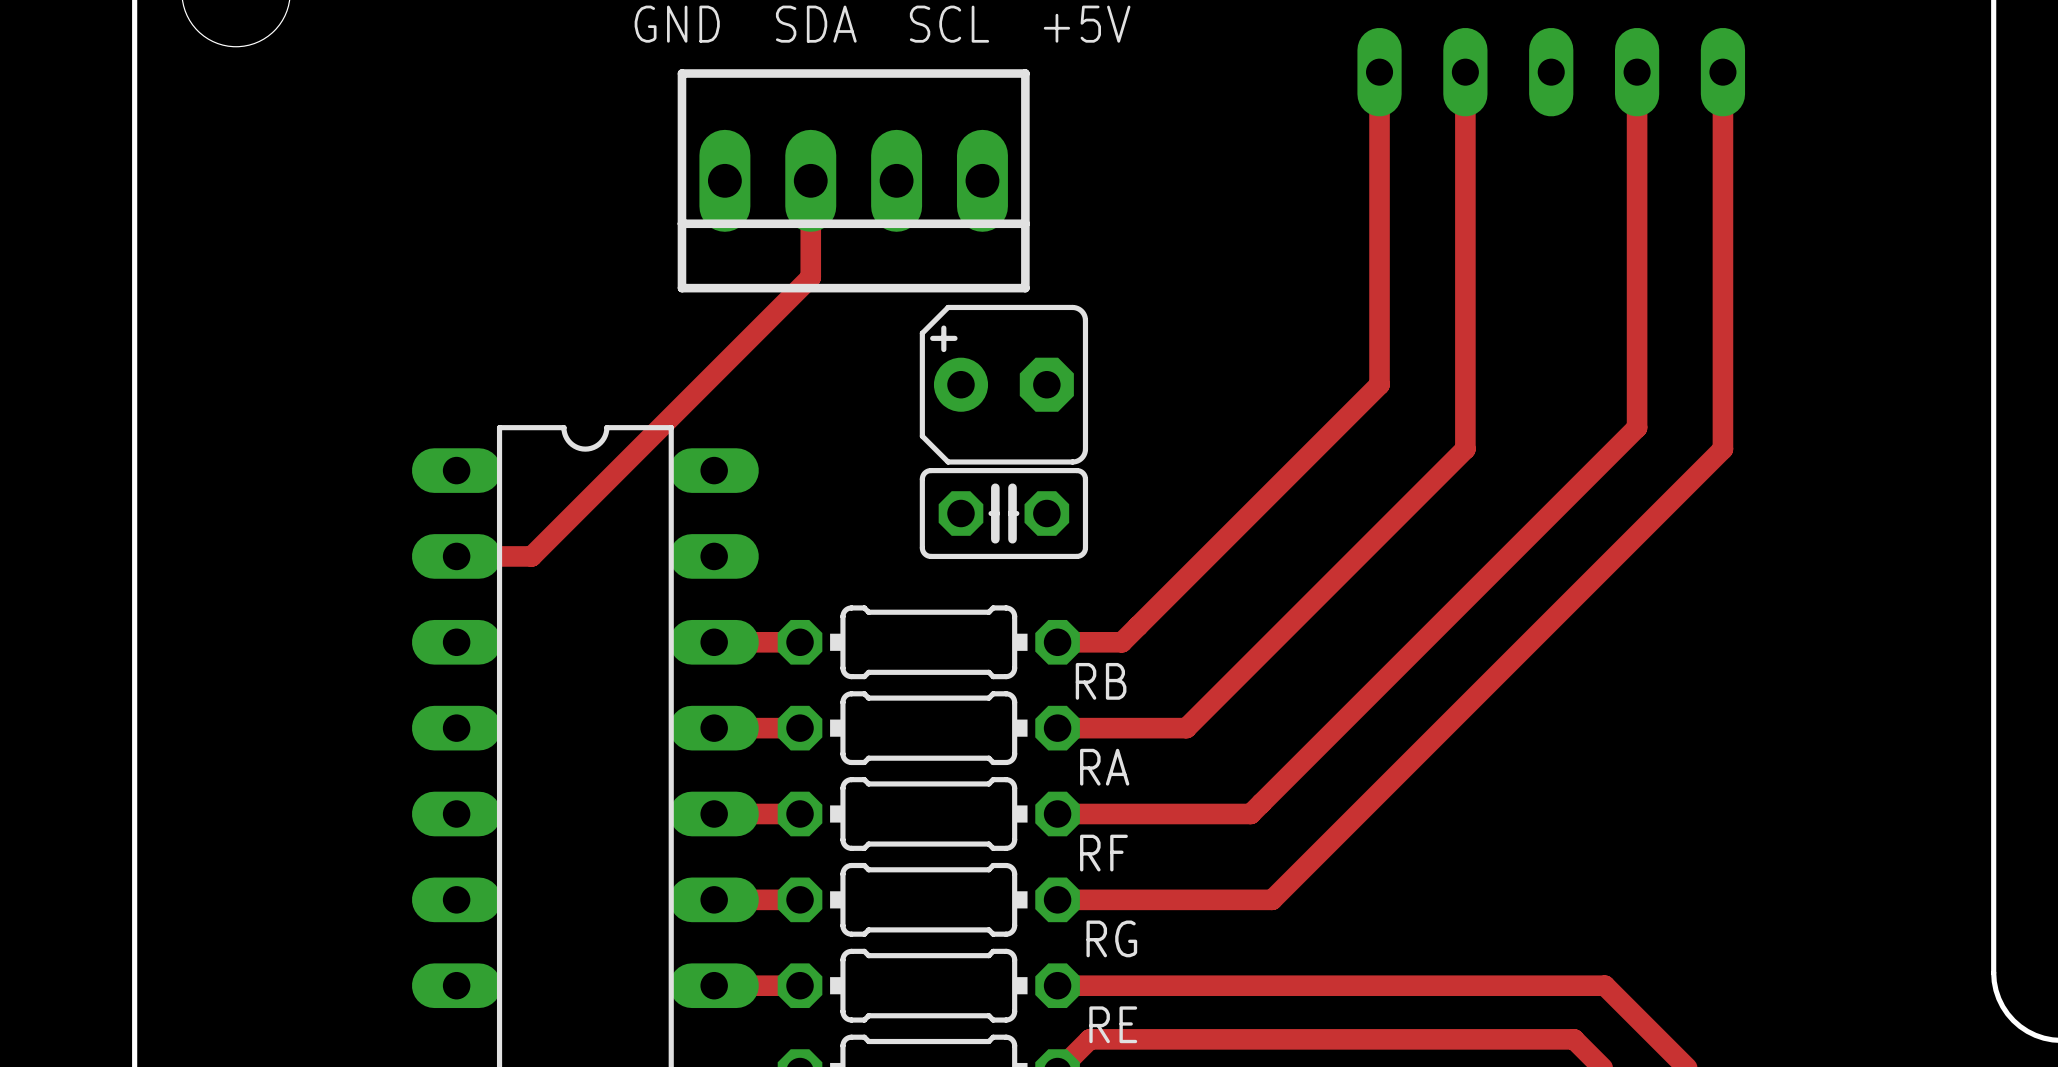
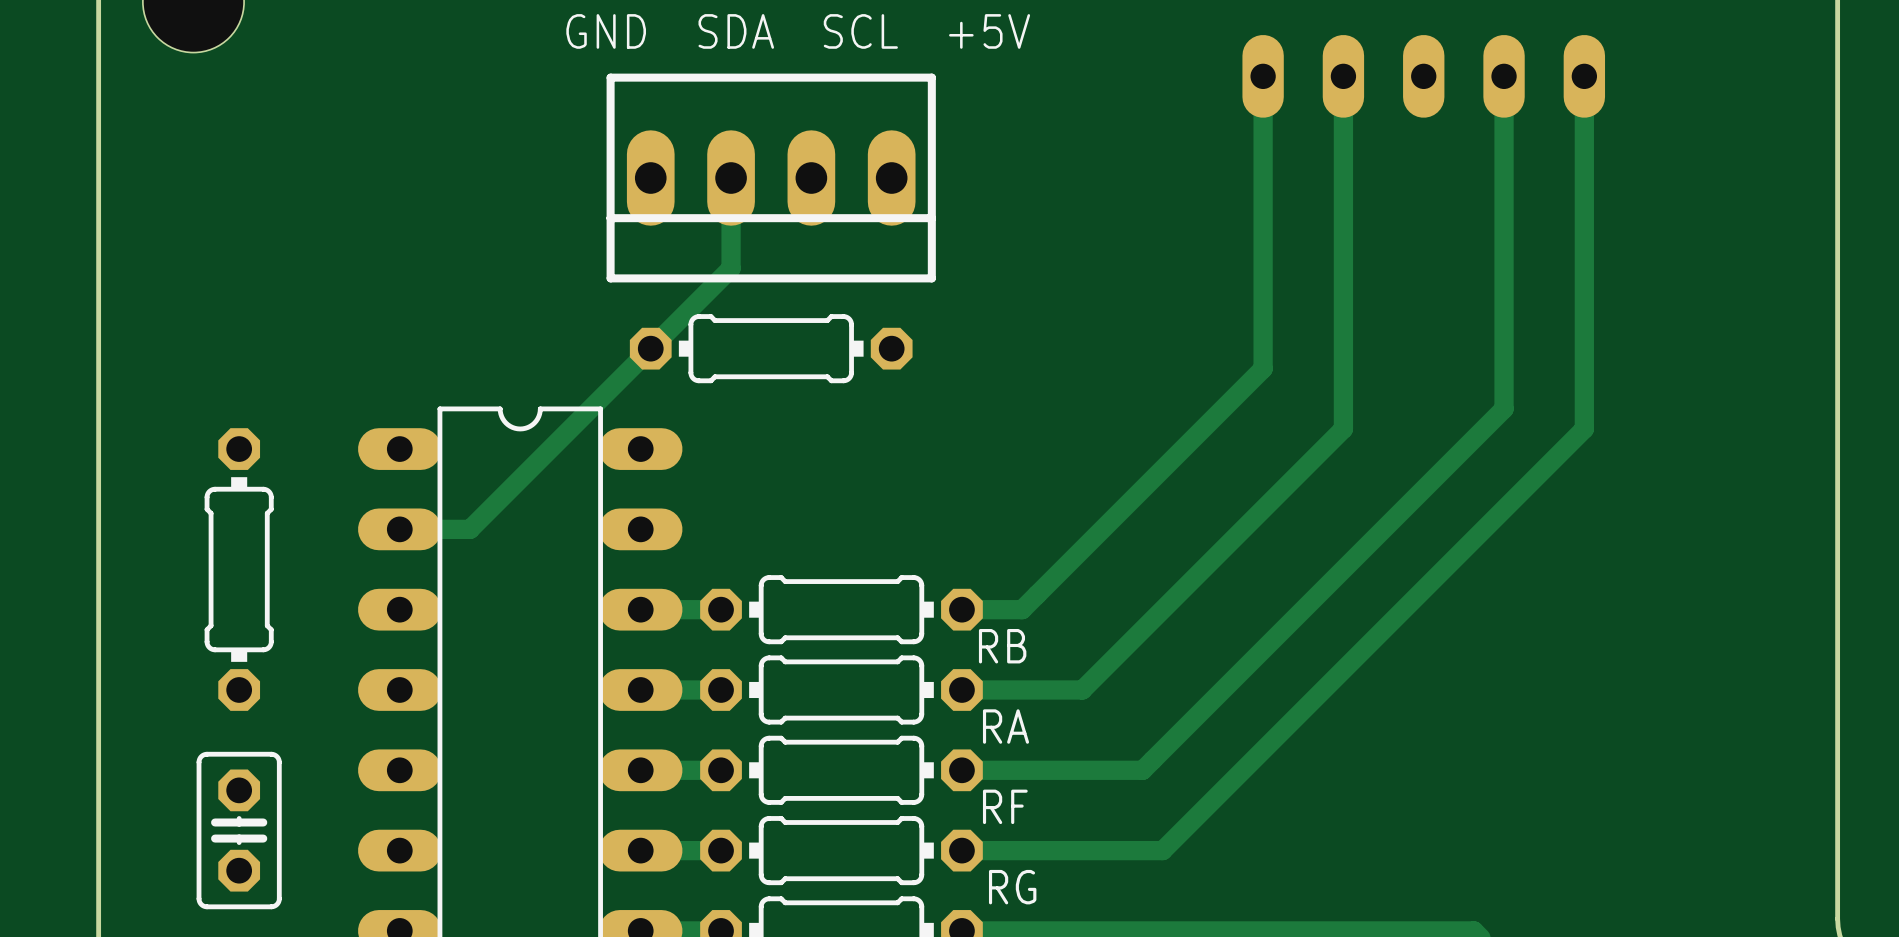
part: none -> (771, 348)
part: (1003, 384) -> none
part rotation: 0° (1003, 513) -> 90° clockwise (239, 830)
part position: (1003, 513) -> (239, 830)
part: none -> (239, 569)

